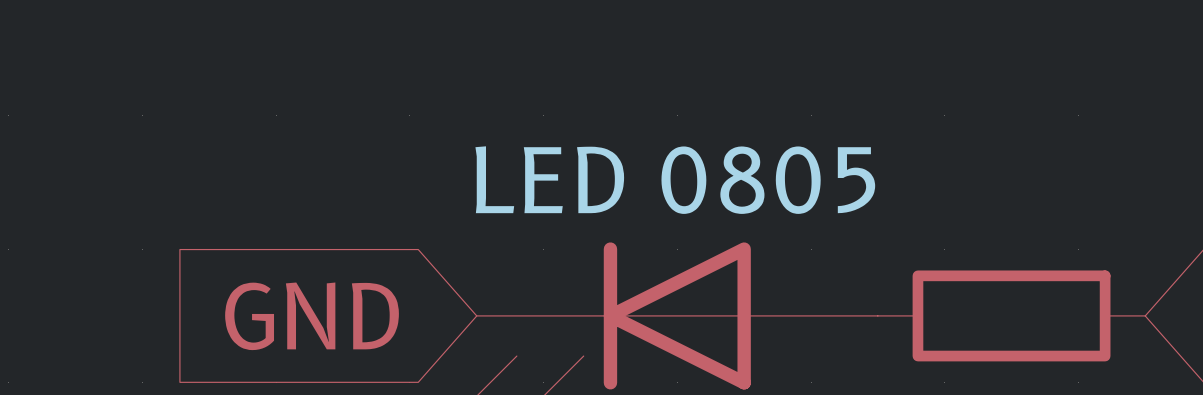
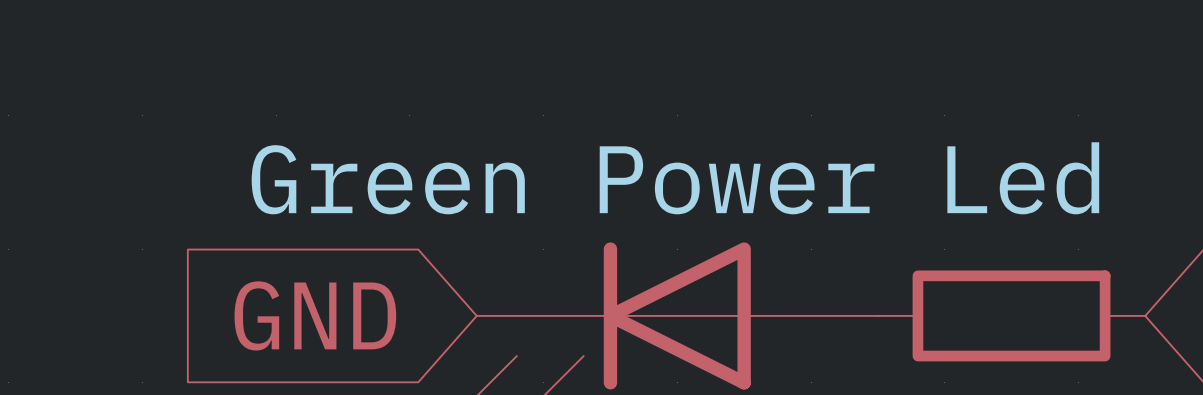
part value: LED 0805 (675, 180) -> Green Power Led (675, 178)

